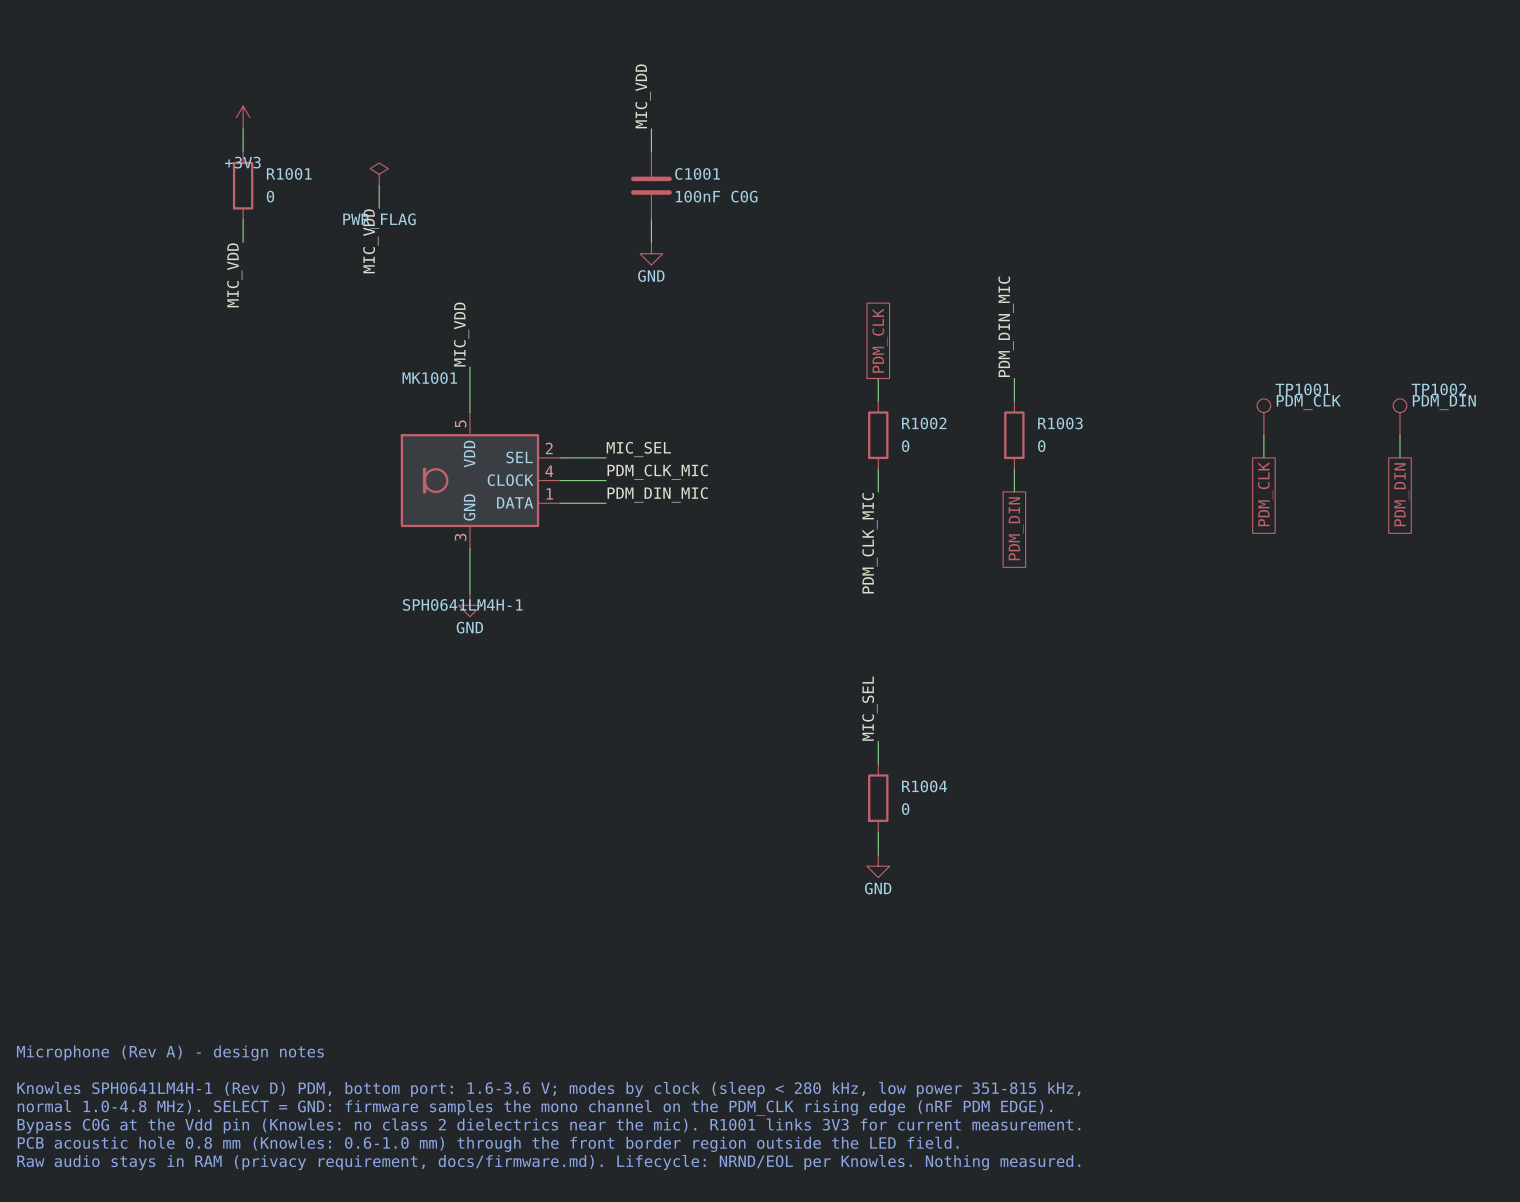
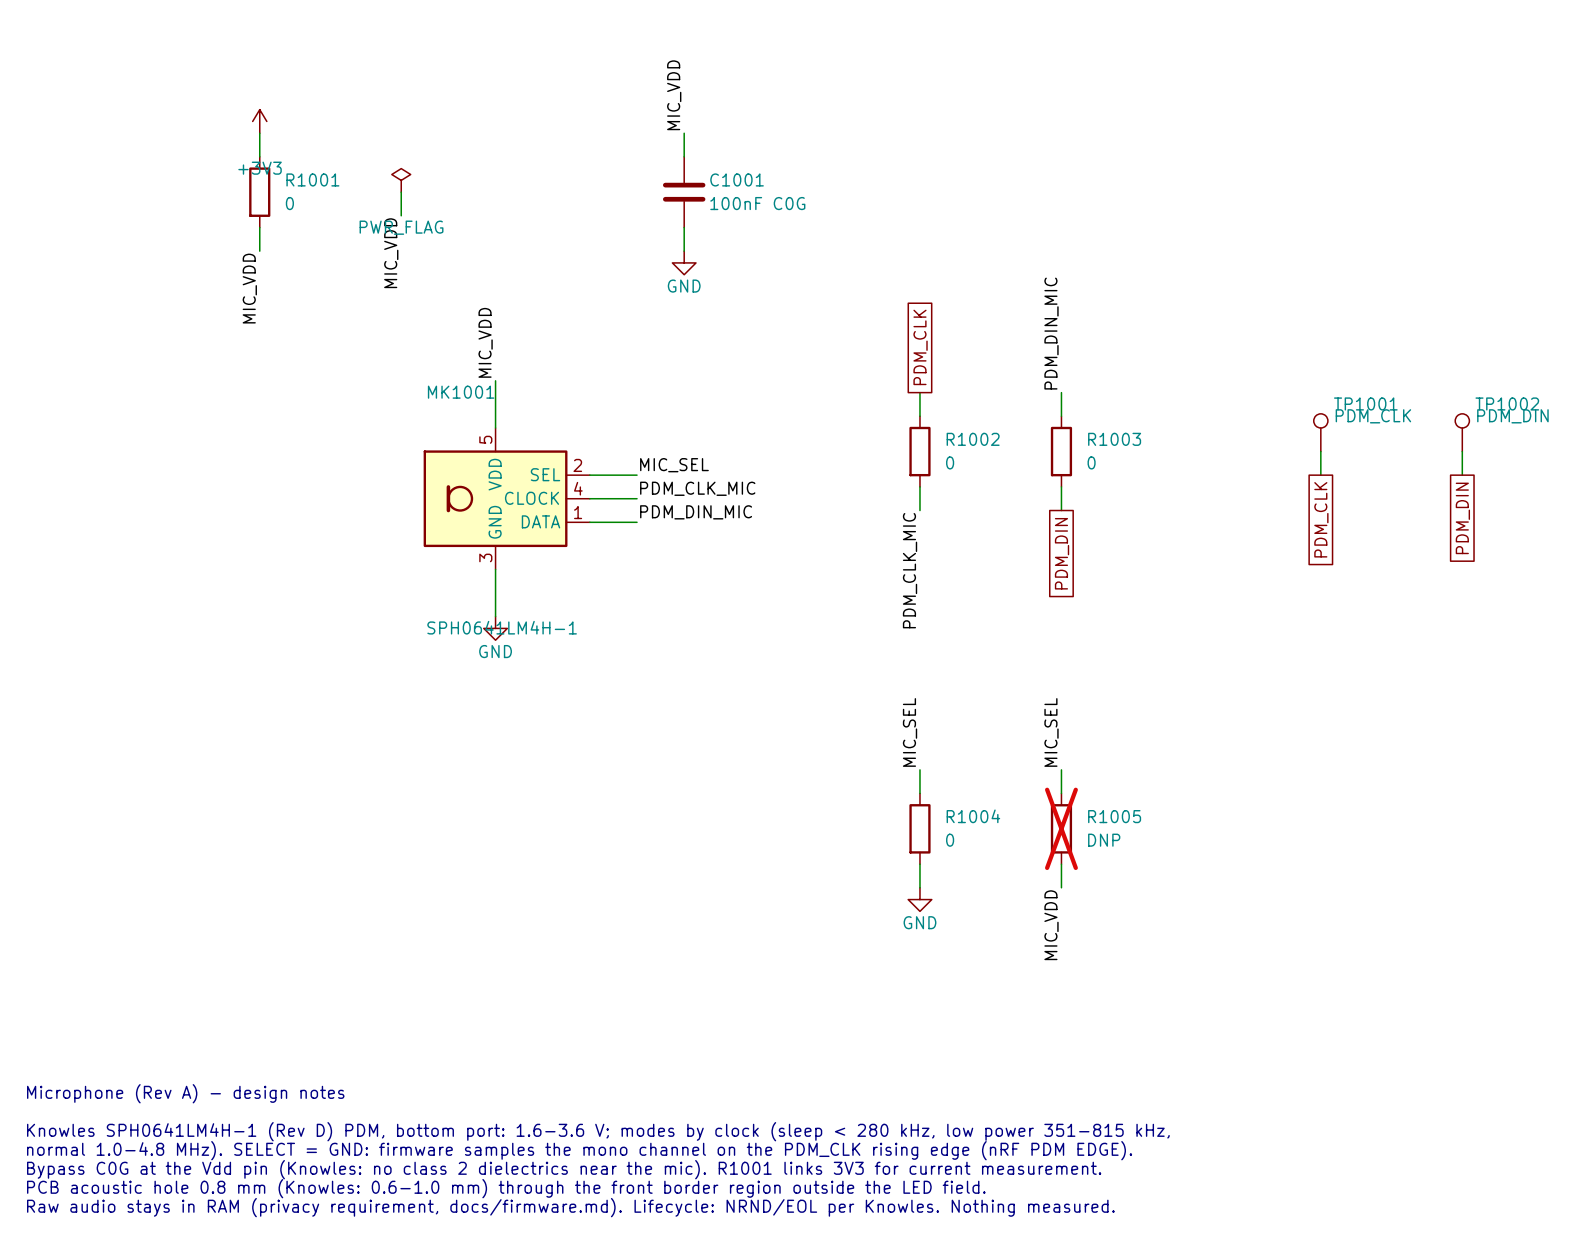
label: none -> MIC_SEL (1051, 732)
wire: none -> (1061, 769) (1061, 793)
R1005: none -> DNP (1061, 828)
wire: none -> (1061, 864) (1061, 887)
label: none -> MIC_VDD (1051, 925)

